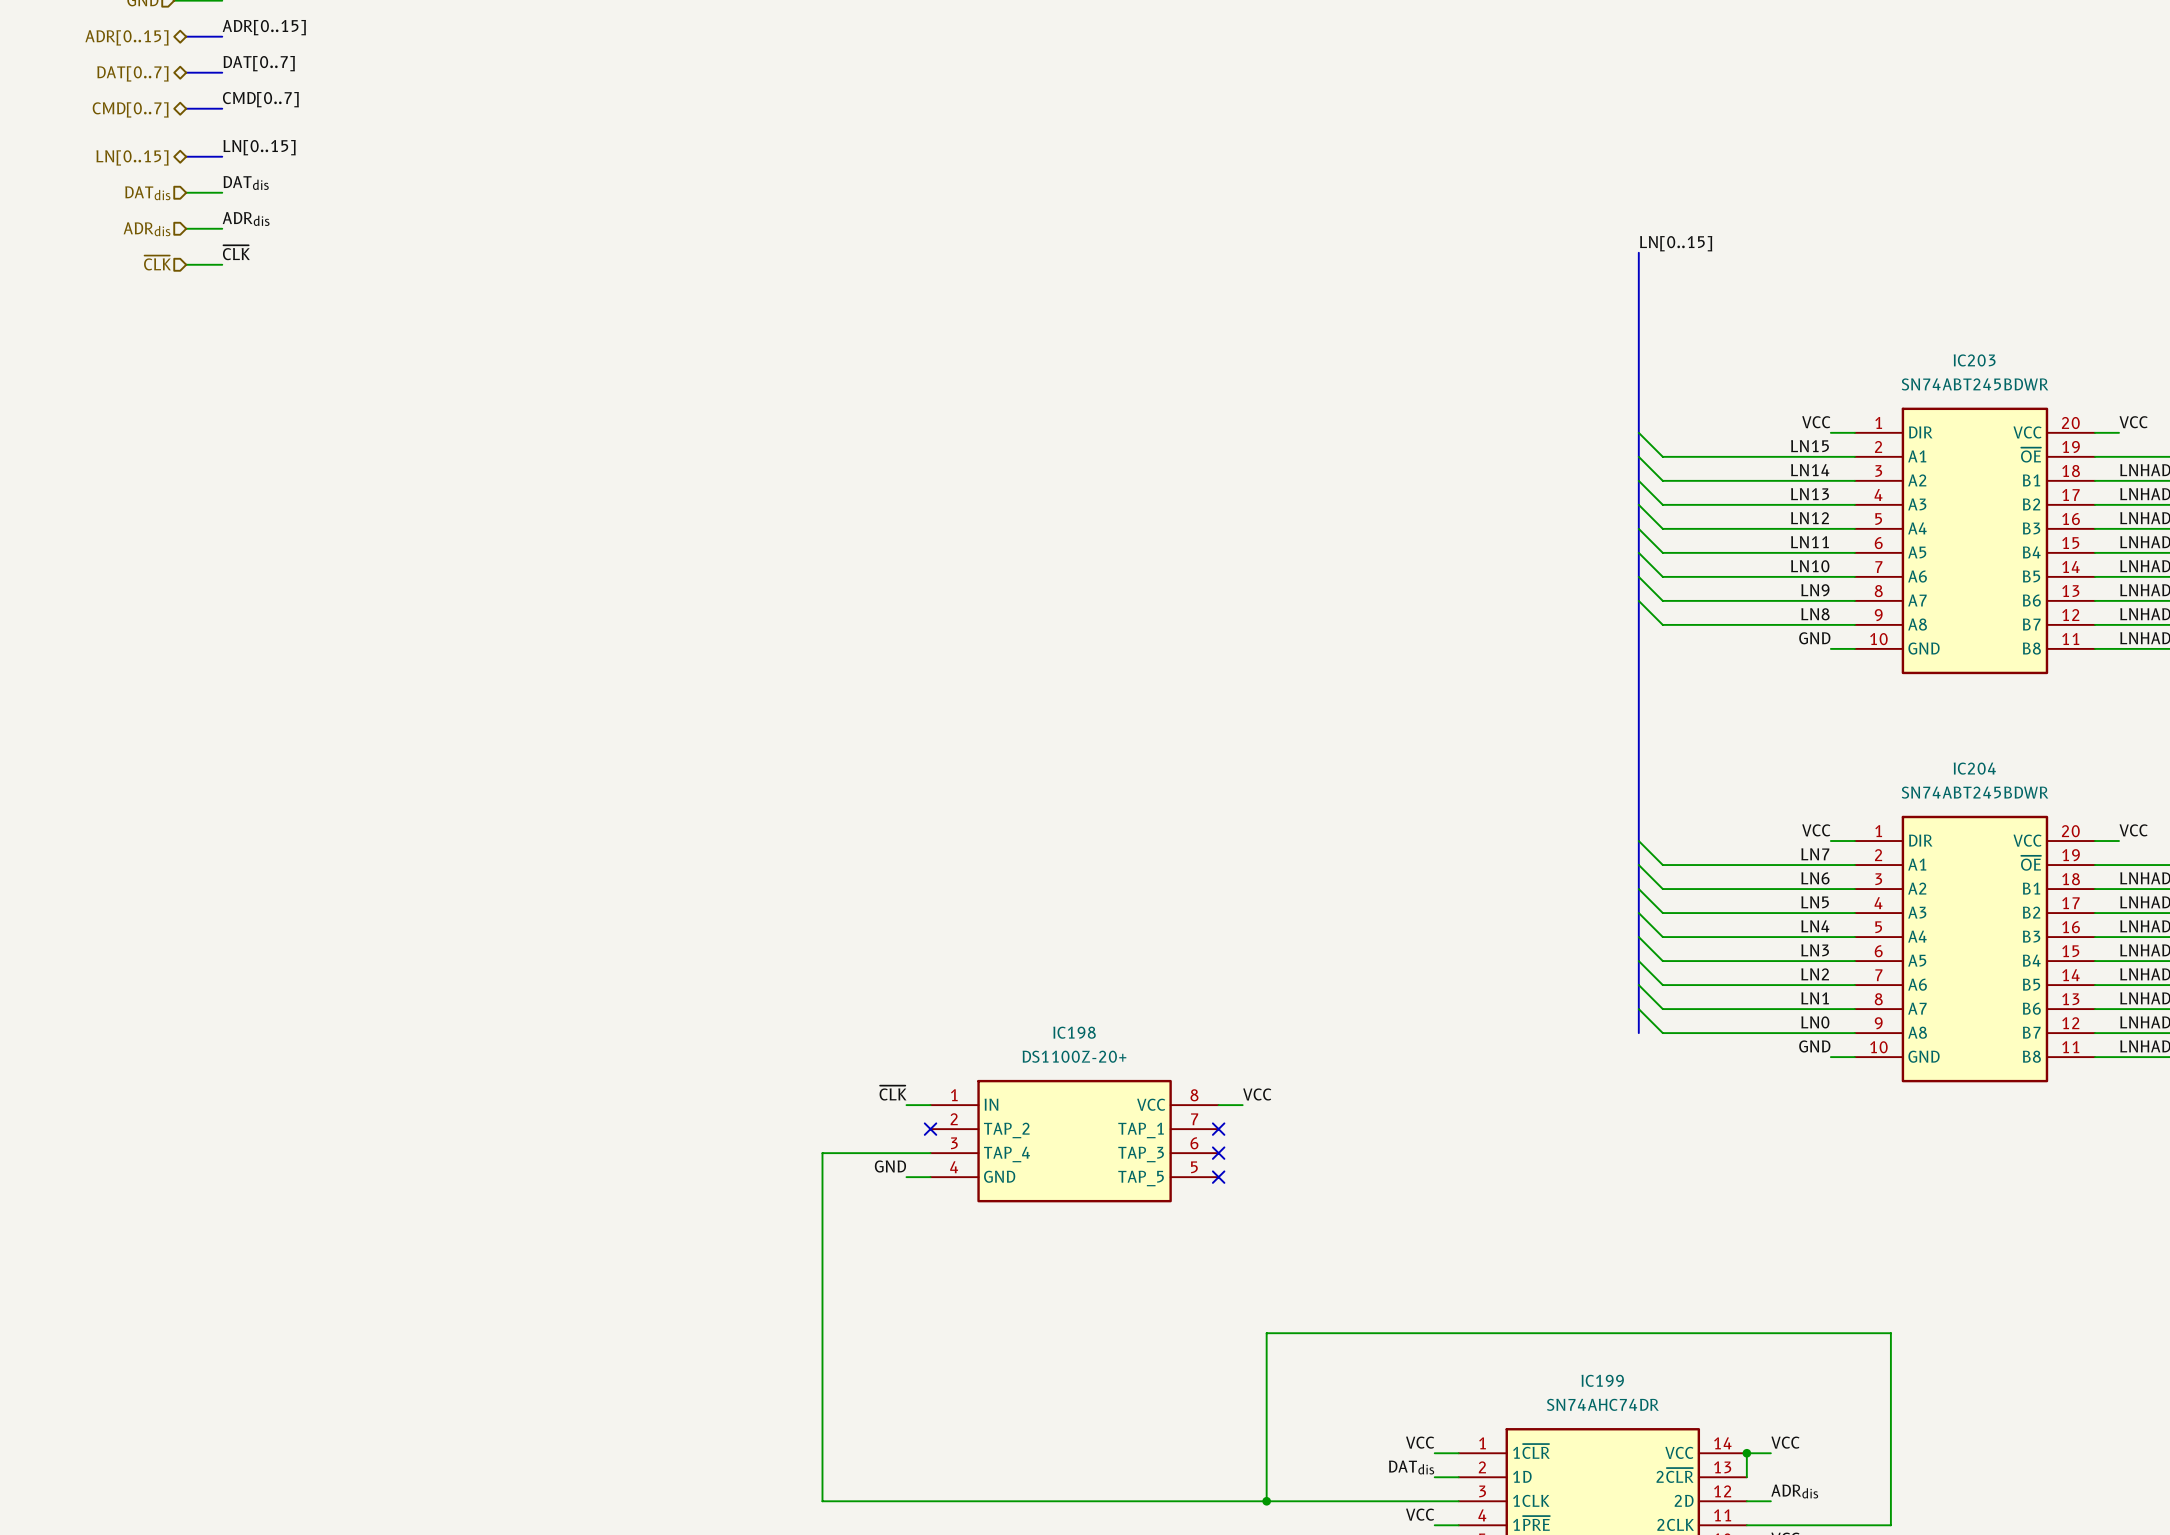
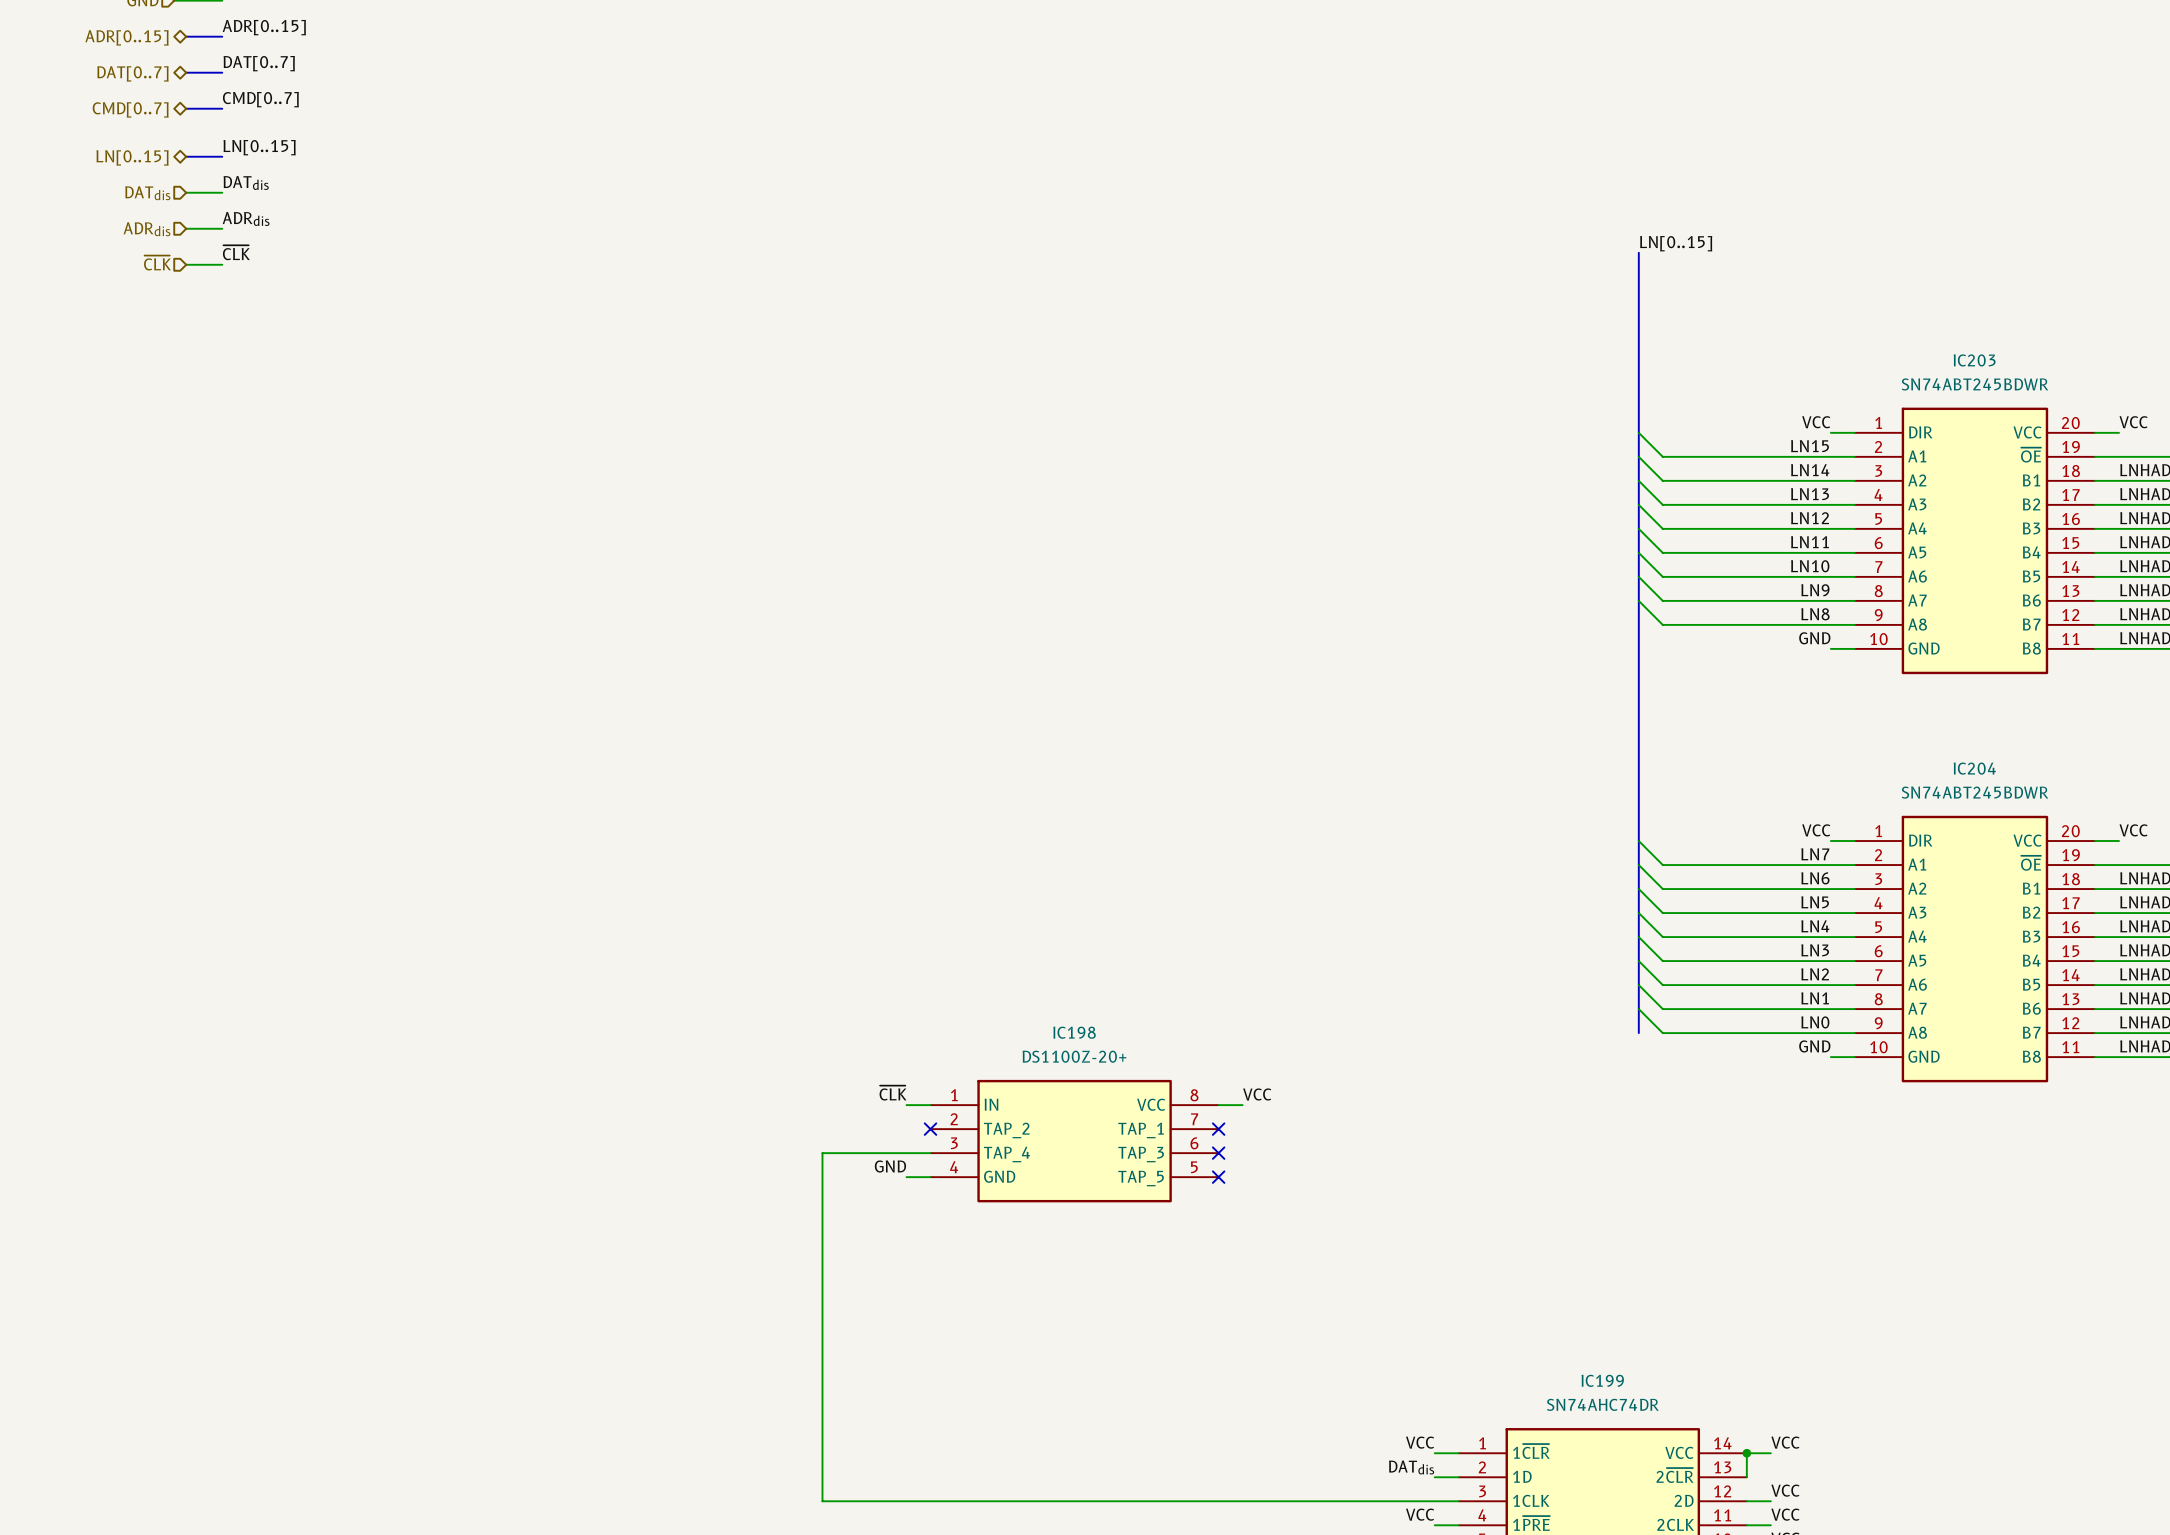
label: ADRdis (1794, 1491) -> VCC (1785, 1490)
wire: (1266, 1501) (1266, 1333) (1890, 1333) (1890, 1525) (1770, 1525) -> none
junction: (1266, 1501) -> none
label: none -> VCC (1785, 1514)

